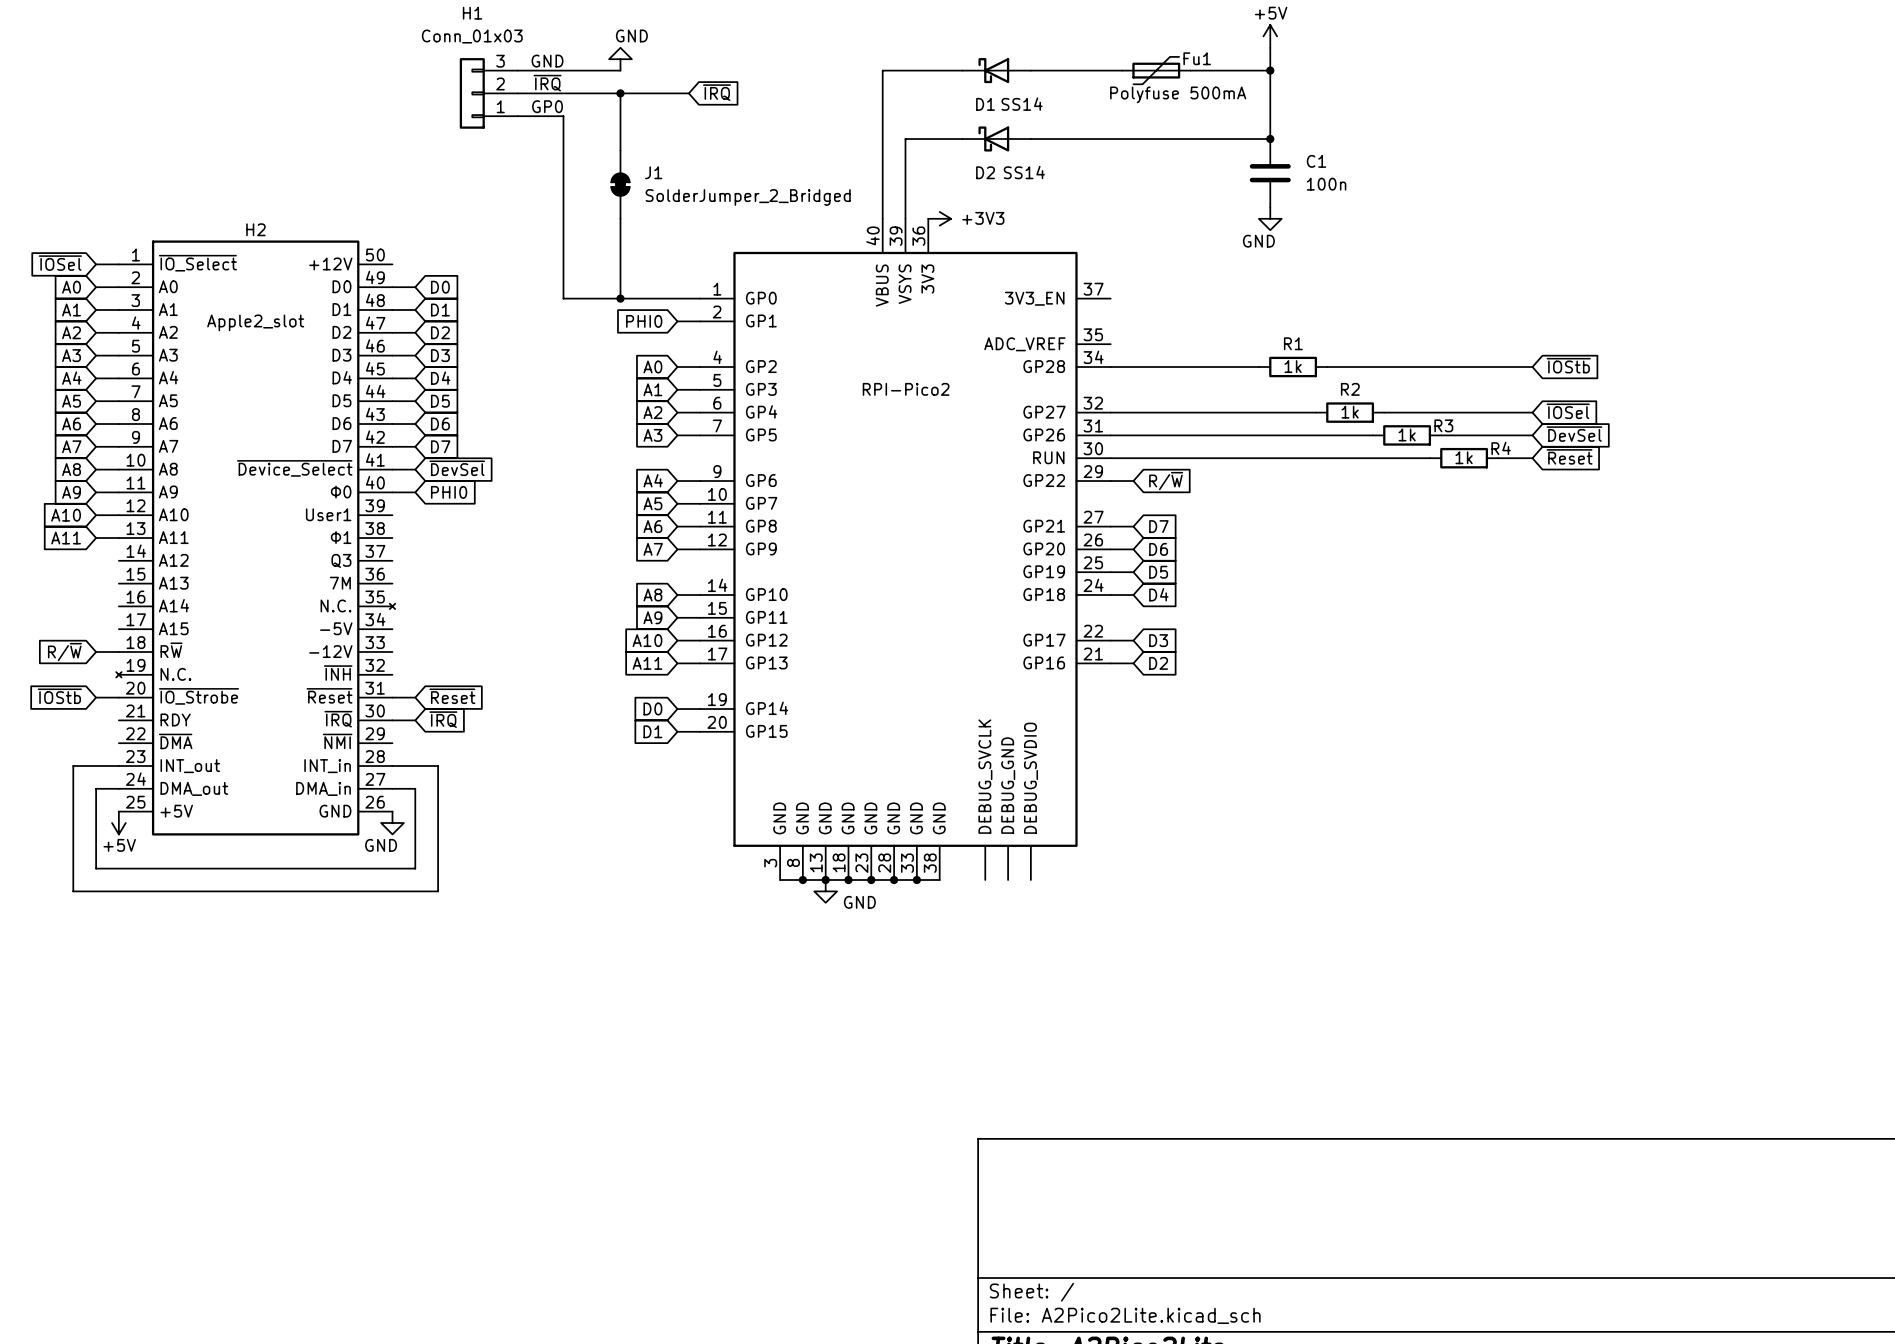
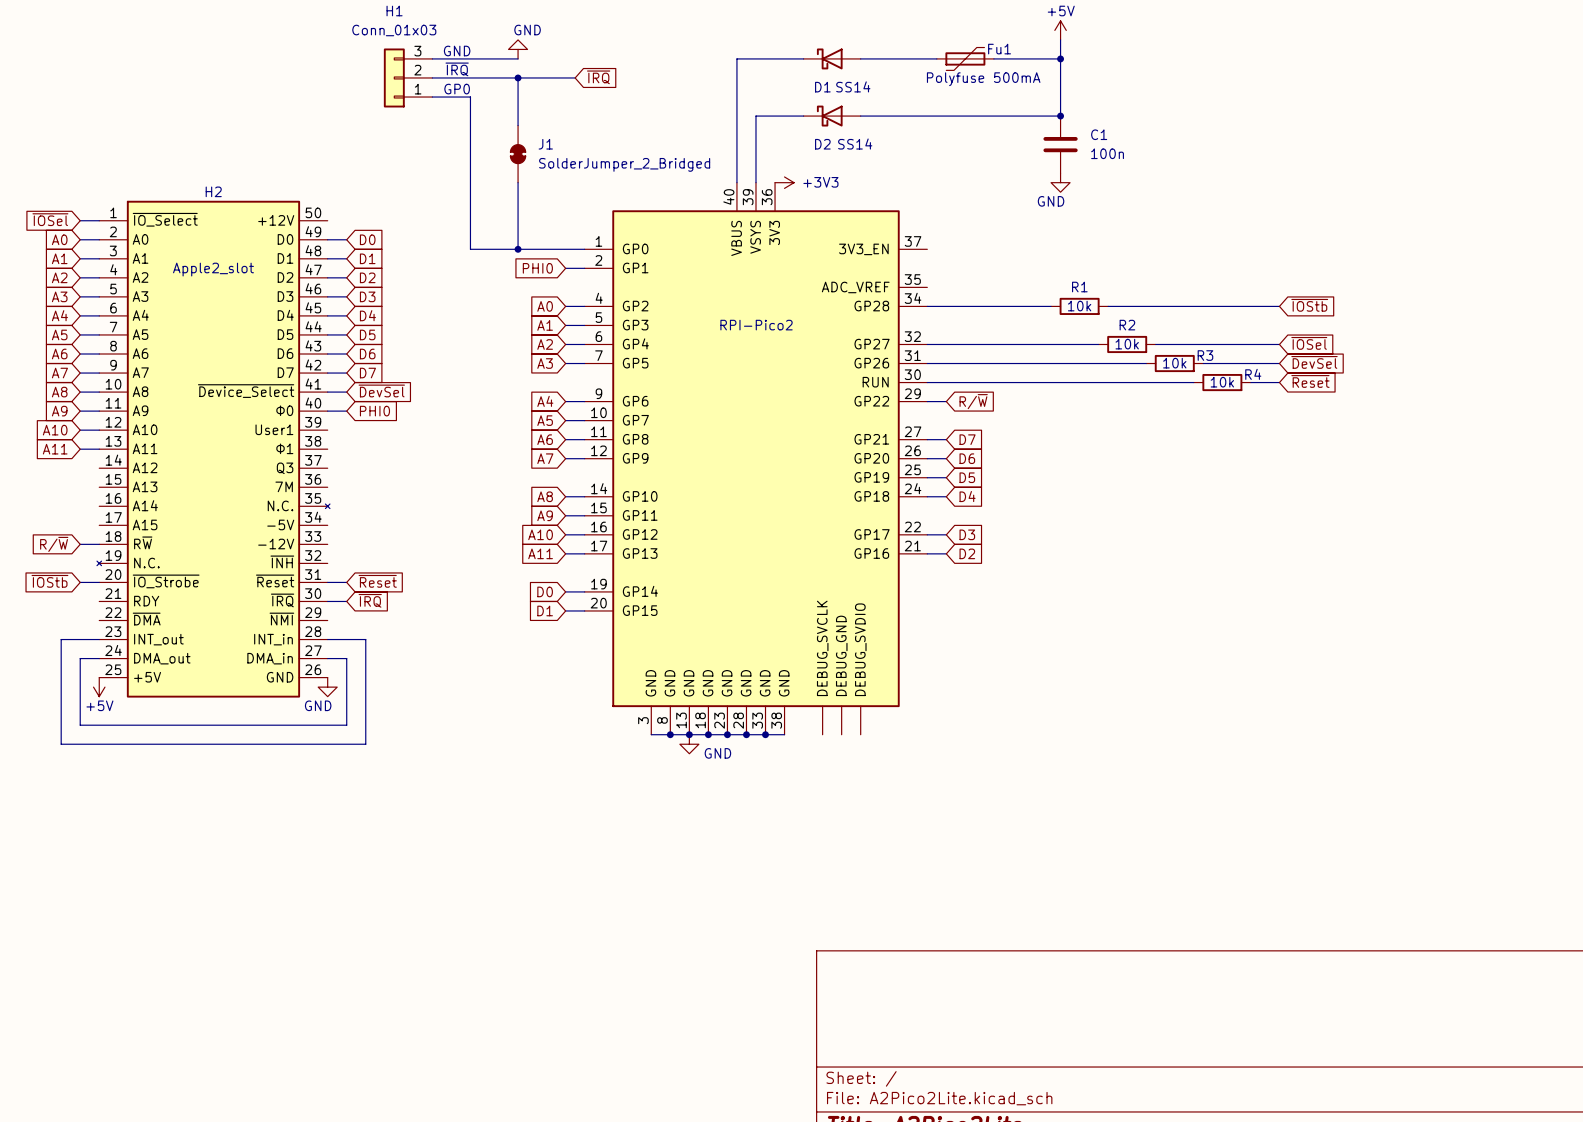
R1 value: 1k (1293, 366) -> 10k (1079, 306)
R2 value: 1k (1350, 412) -> 10k (1127, 344)
R3 value: 1k (1407, 434) -> 10k (1174, 363)
R4 value: 1k (1464, 457) -> 10k (1222, 382)

